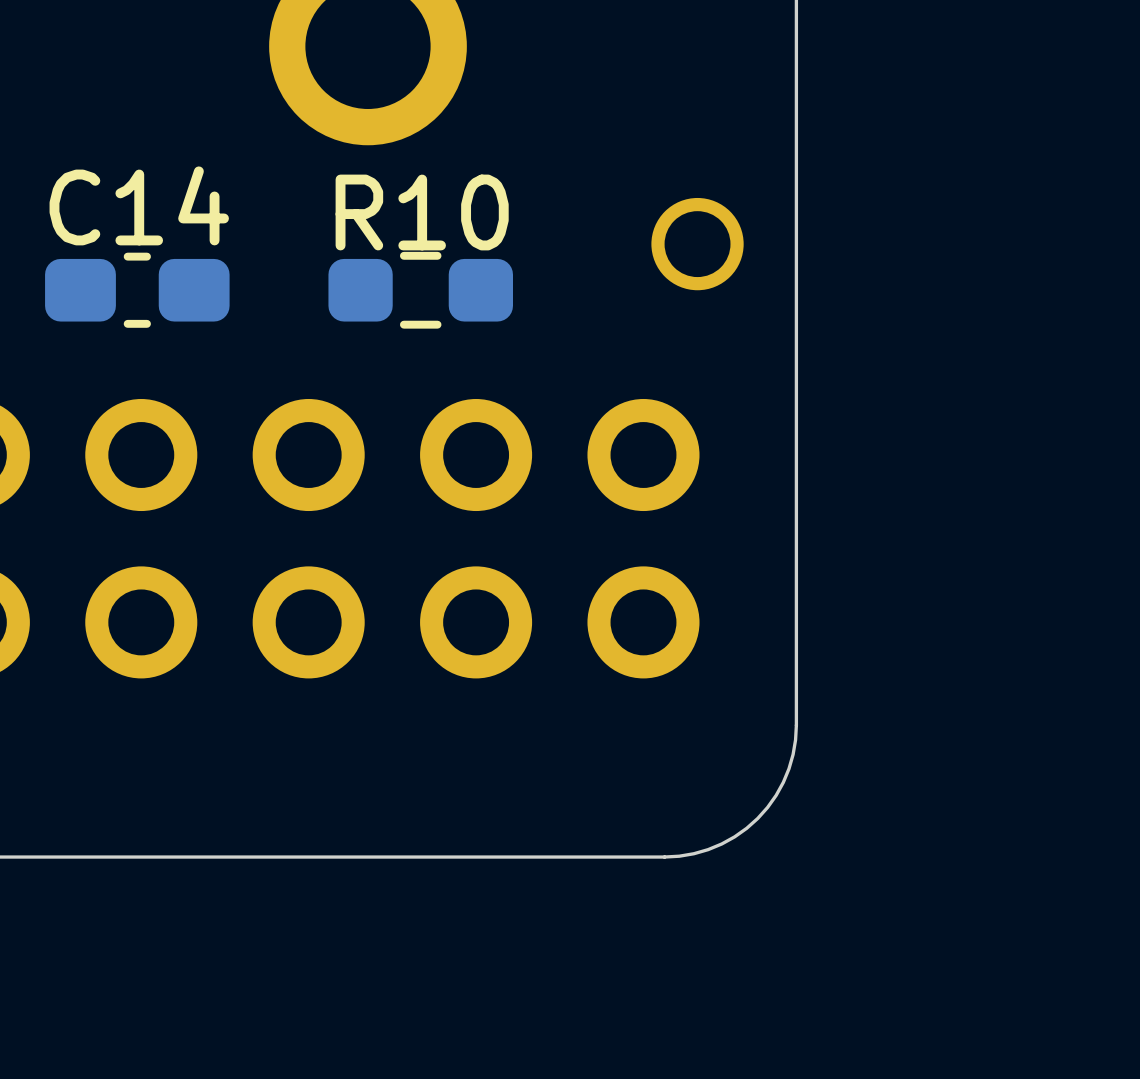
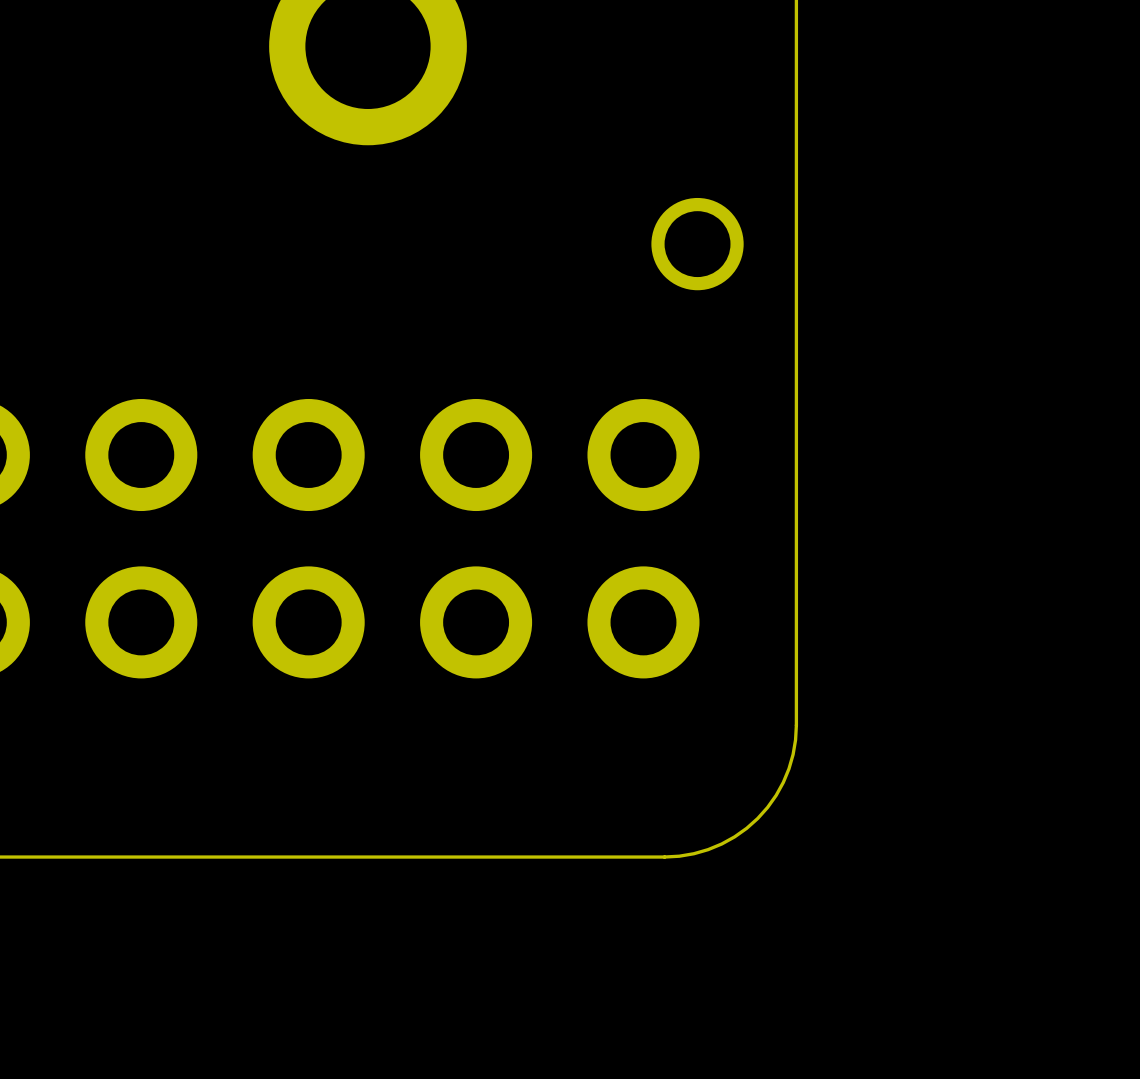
C14: (137, 290) -> none
R10: (420, 290) -> none

